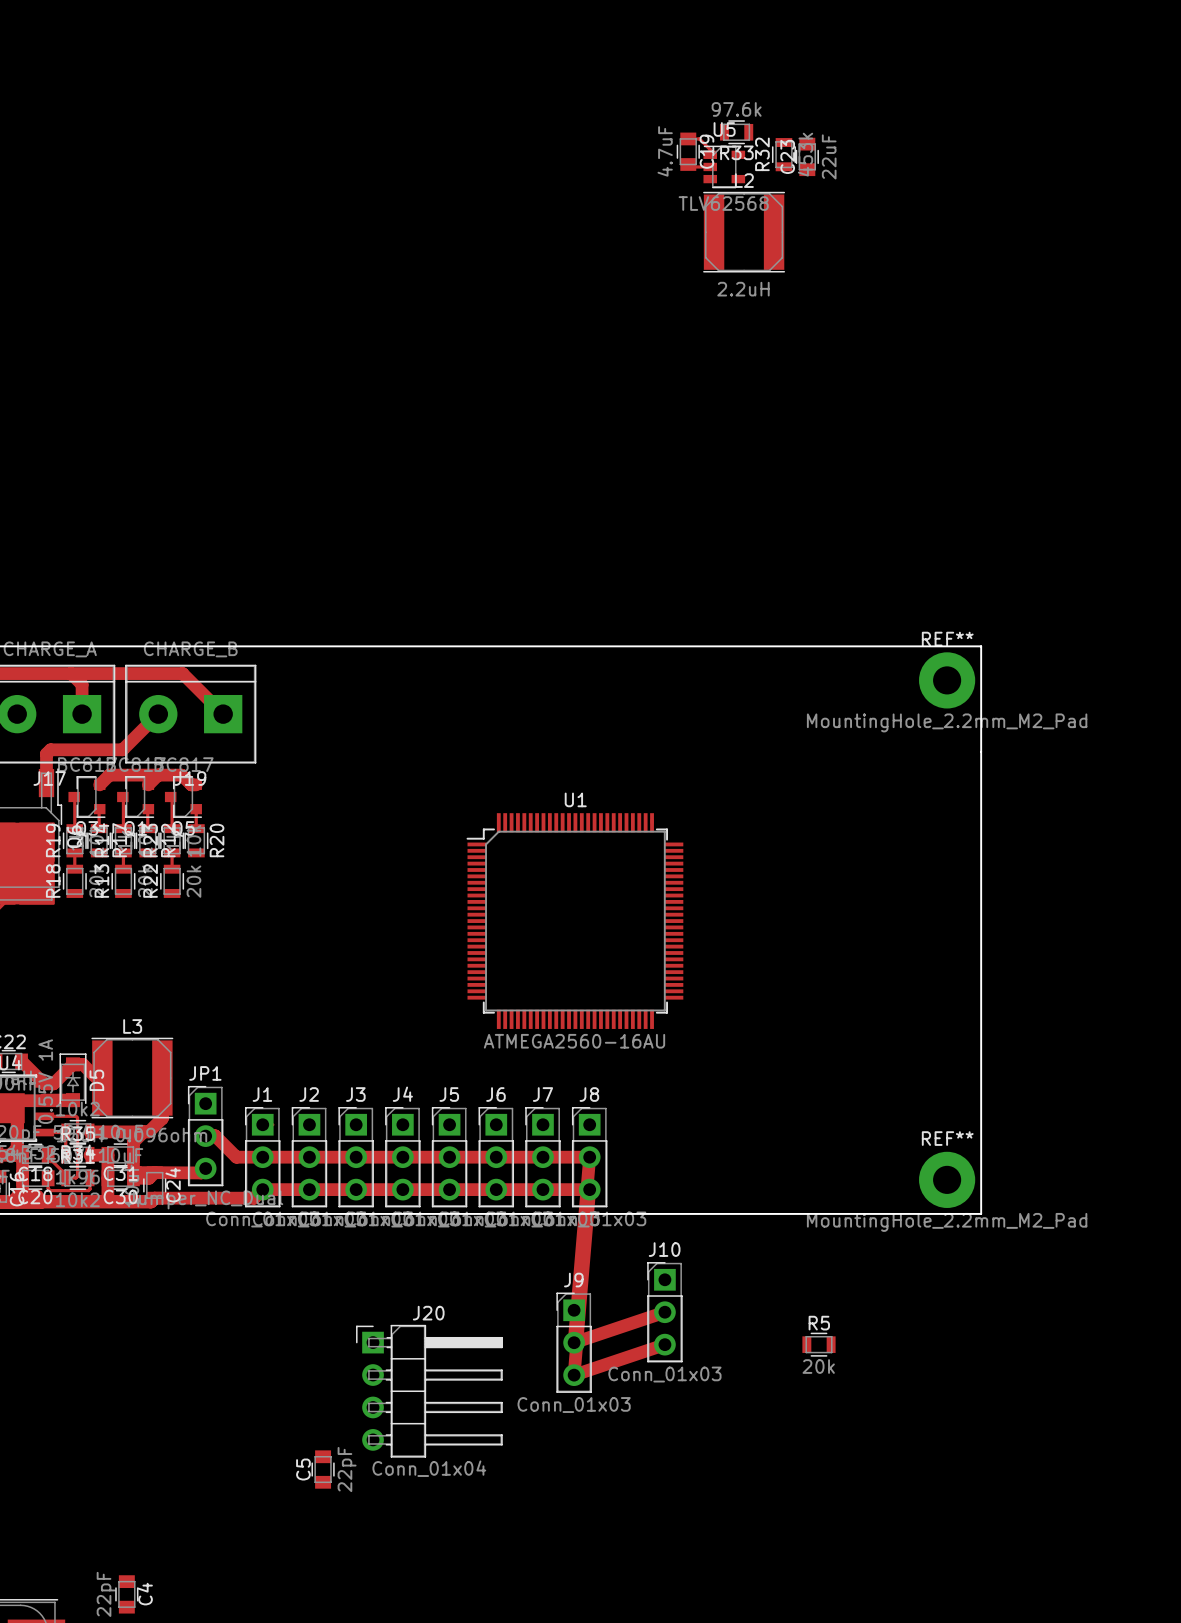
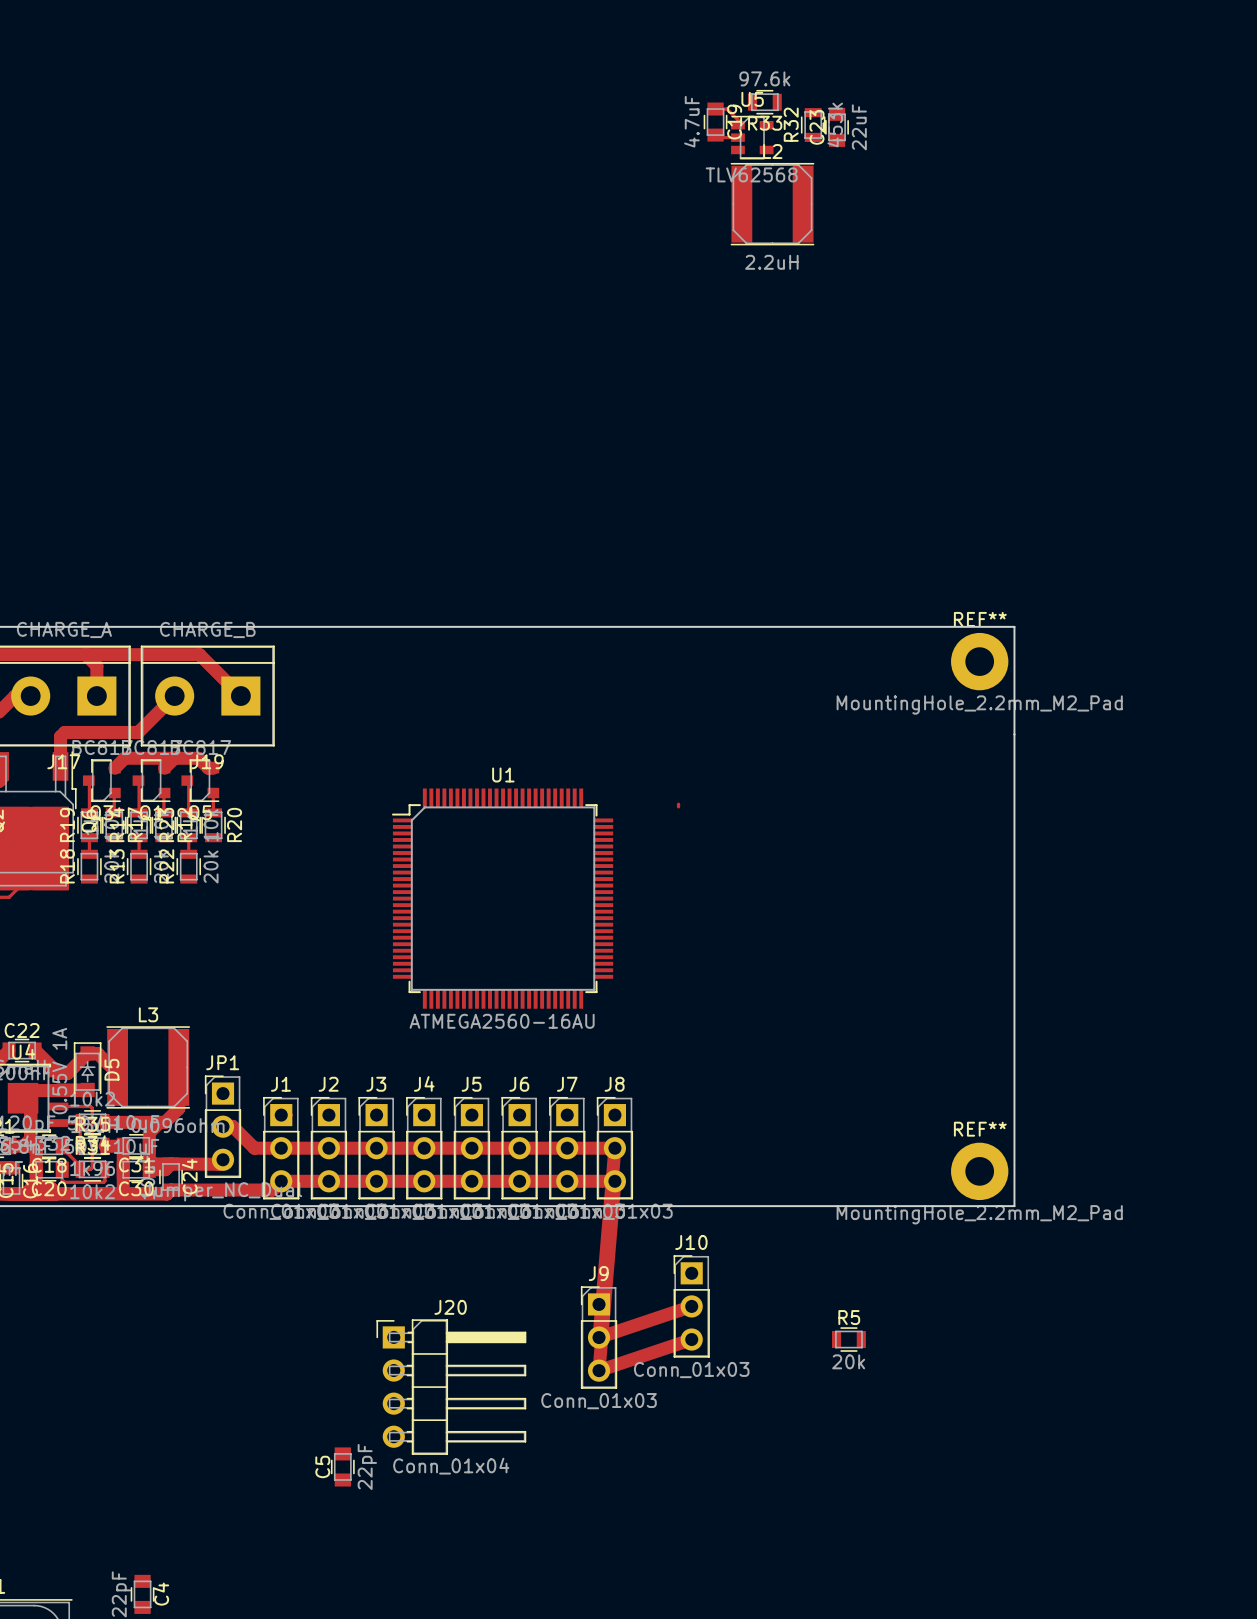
U1 position: (574, 921) -> (502, 898)

